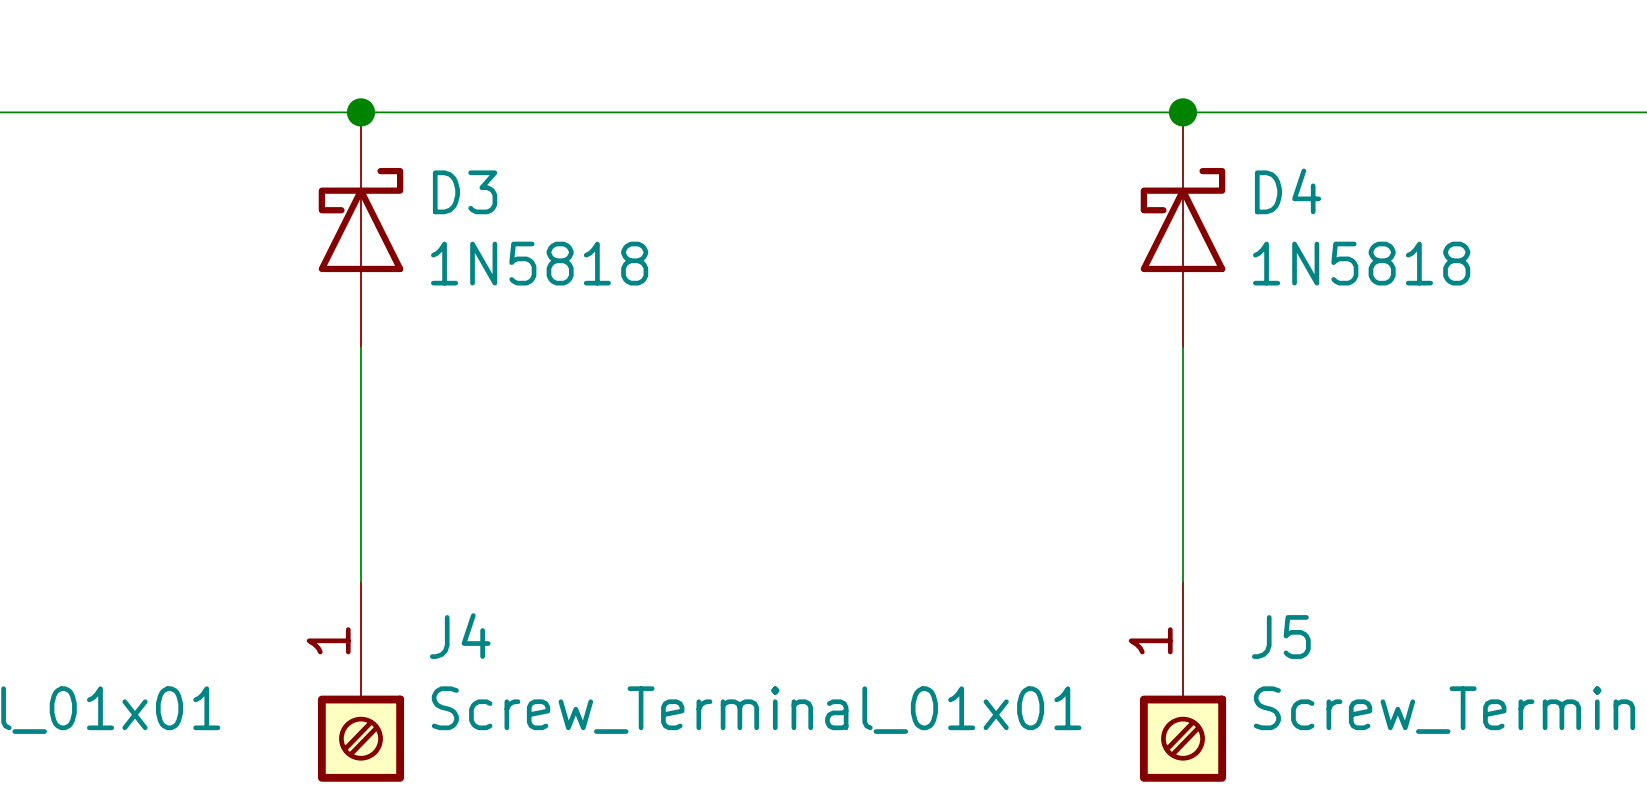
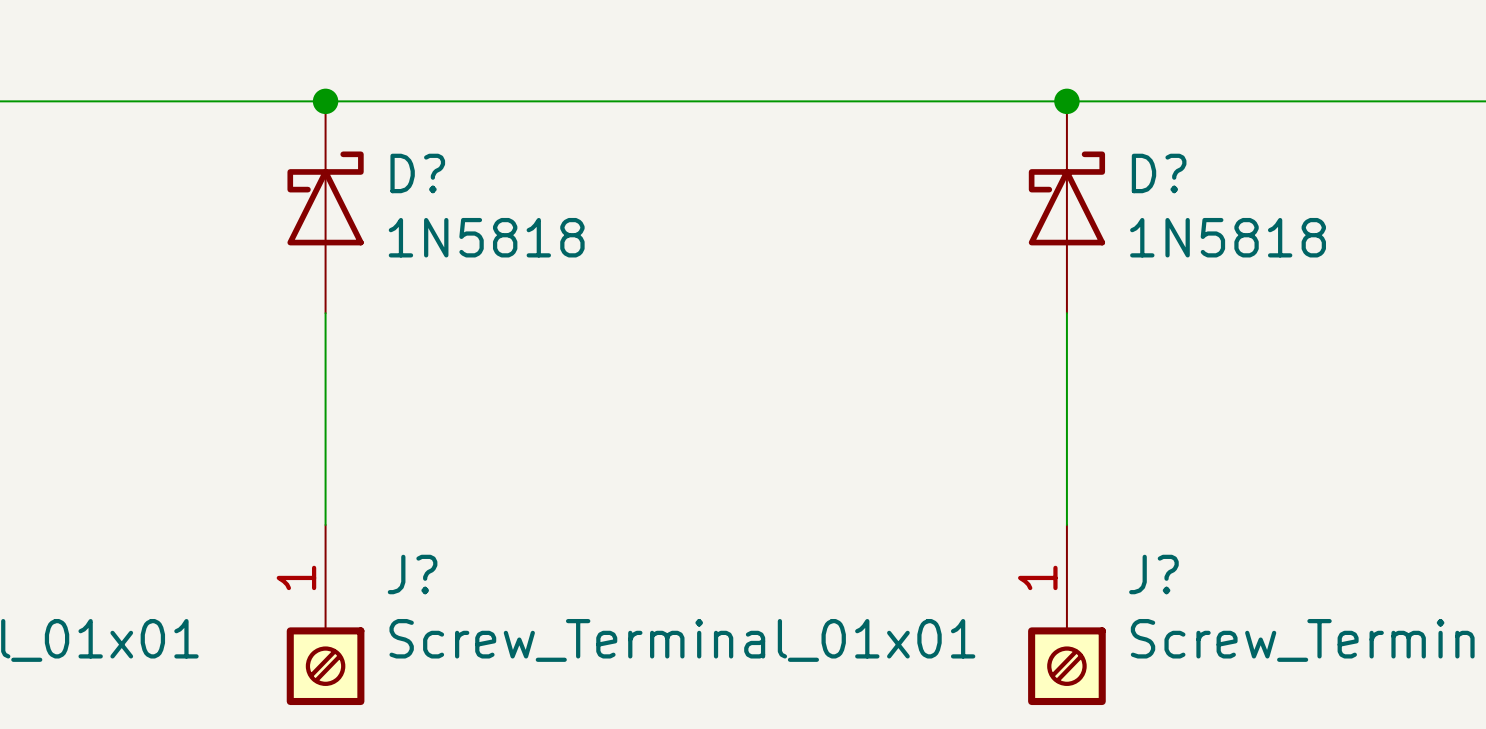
D4 name: D4 (1288, 191) -> D? (1159, 173)
D3 name: D3 (465, 192) -> D? (417, 173)
J4 name: J4 (460, 636) -> J? (412, 574)
J5 name: J5 (1281, 637) -> J? (1153, 574)

